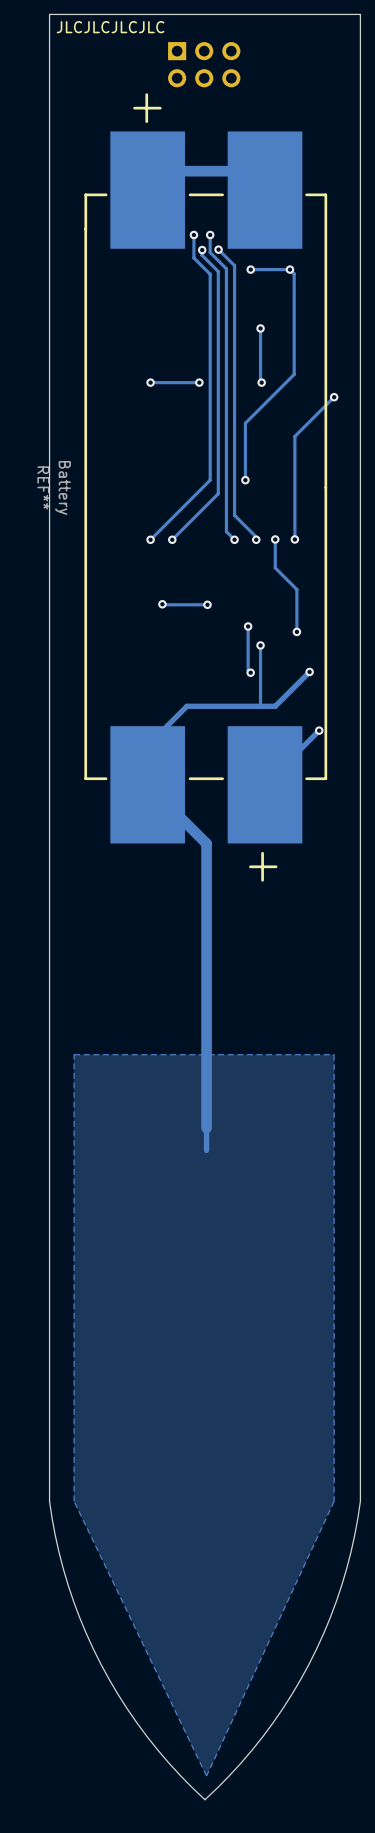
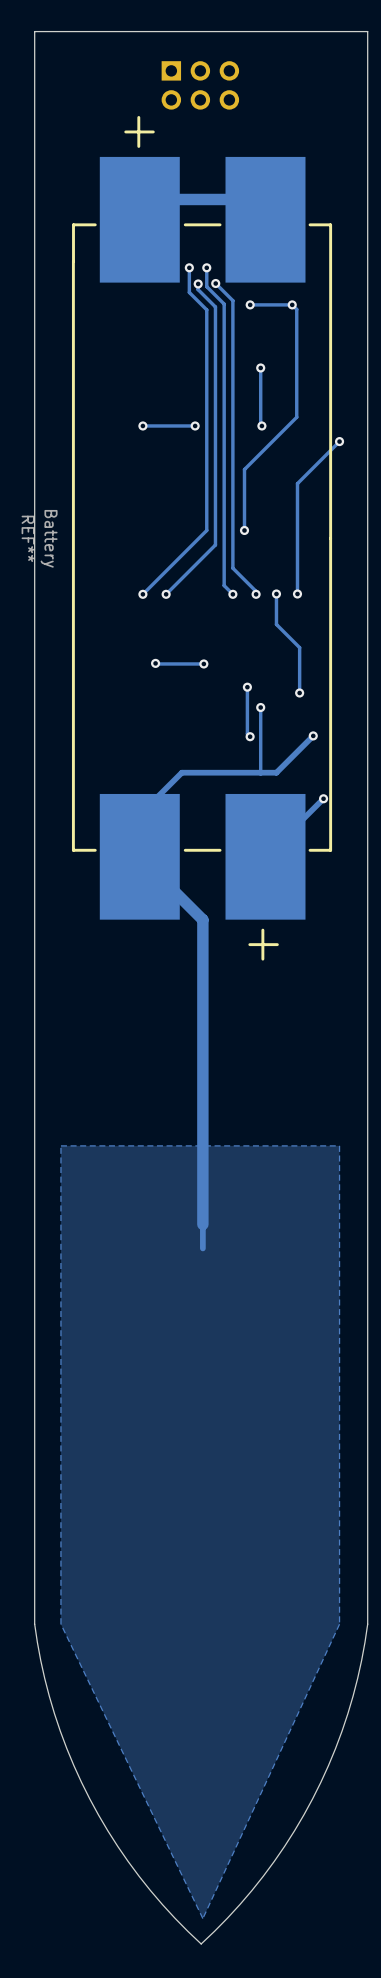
text: JLCJLCJLCJLC (110, 27) -> none

